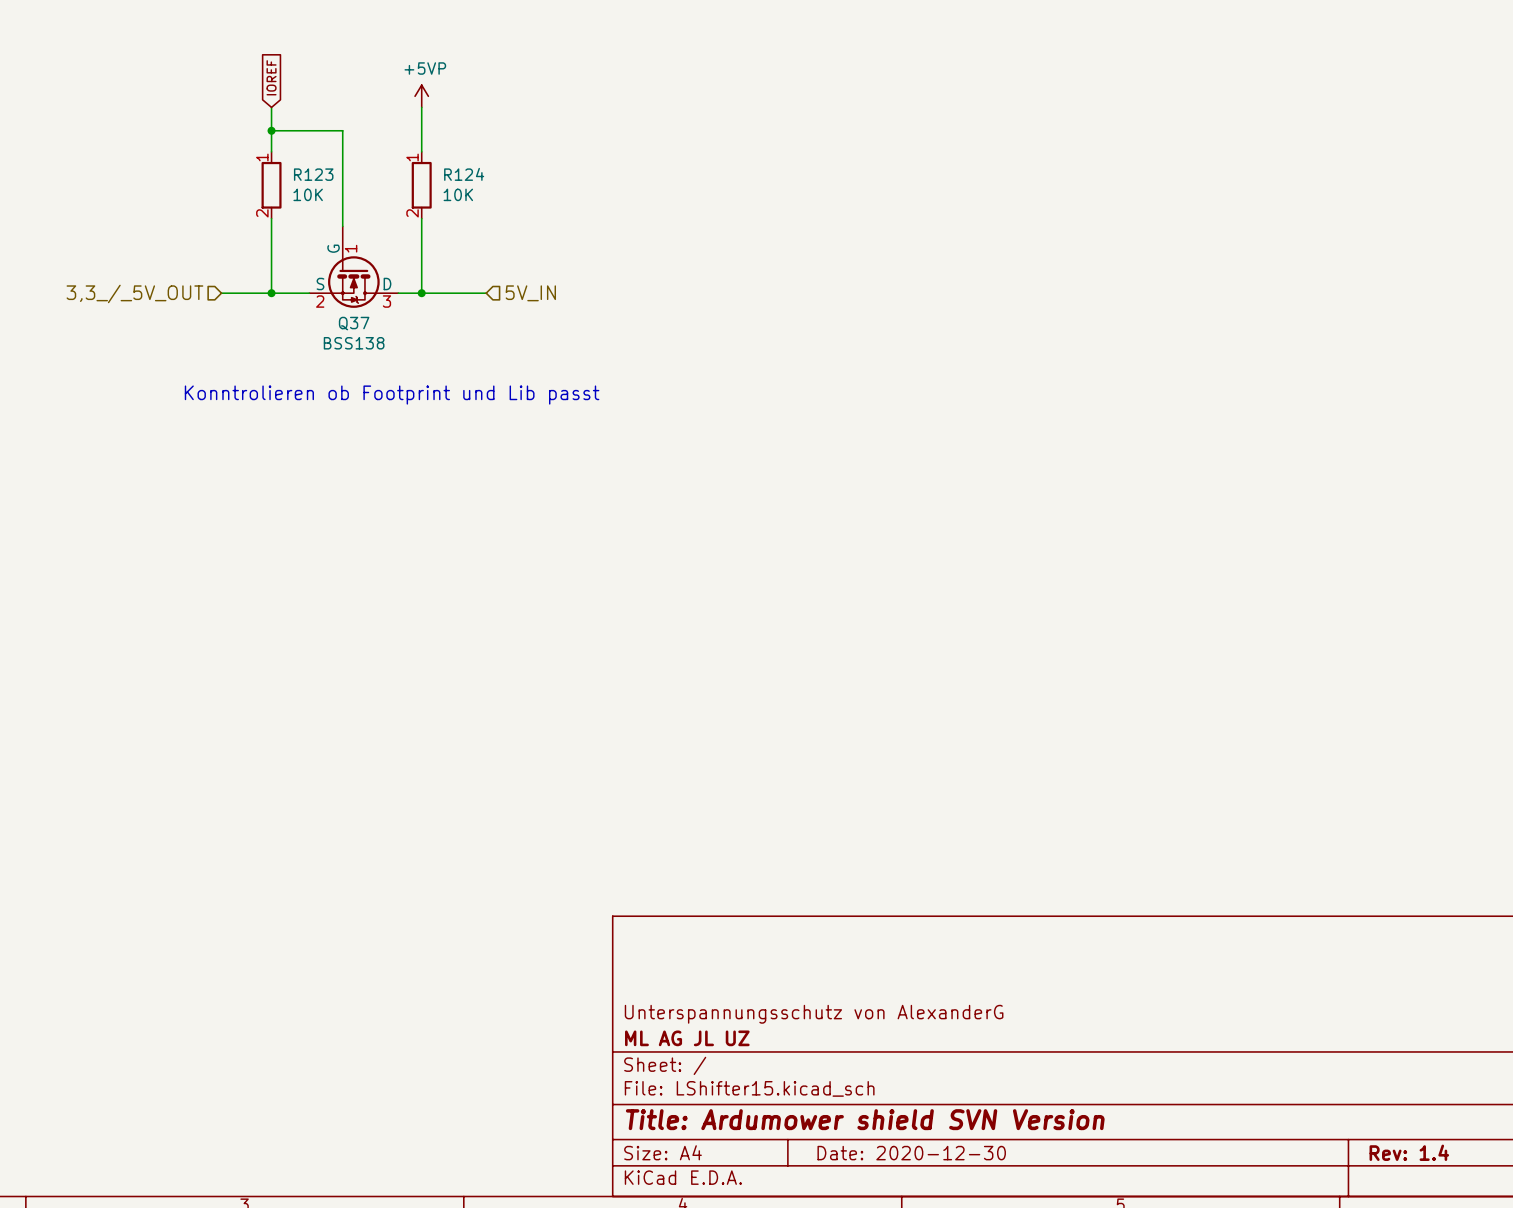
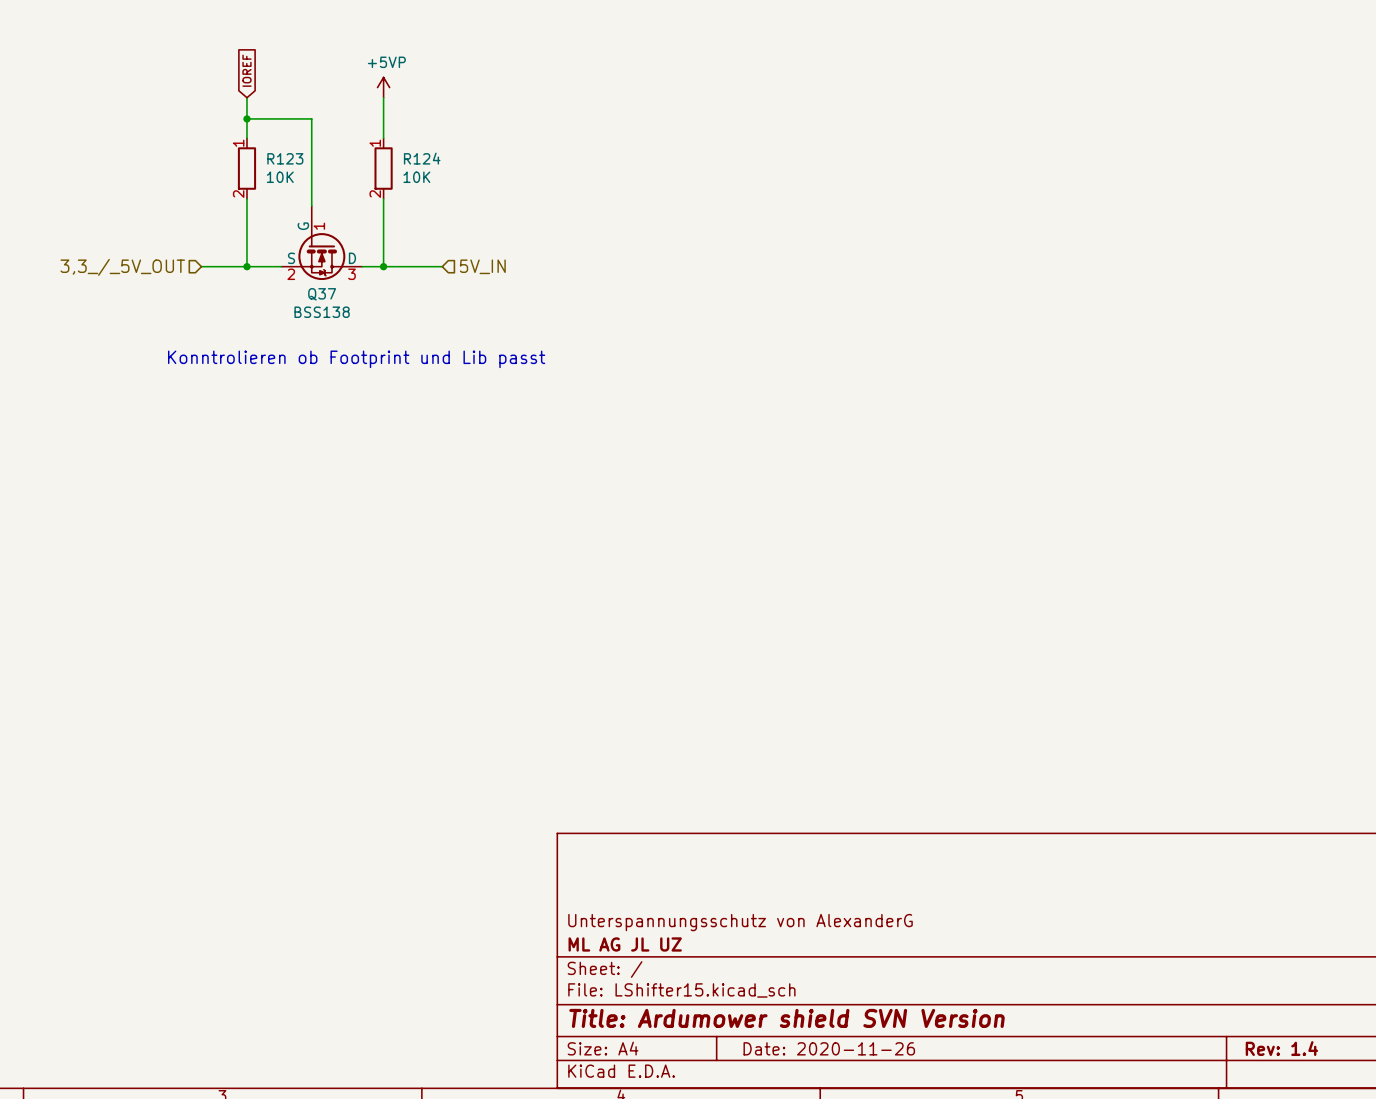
title block: Date: 2020-12-30 (911, 1153) -> Date: 2020-11-26 (829, 1048)

